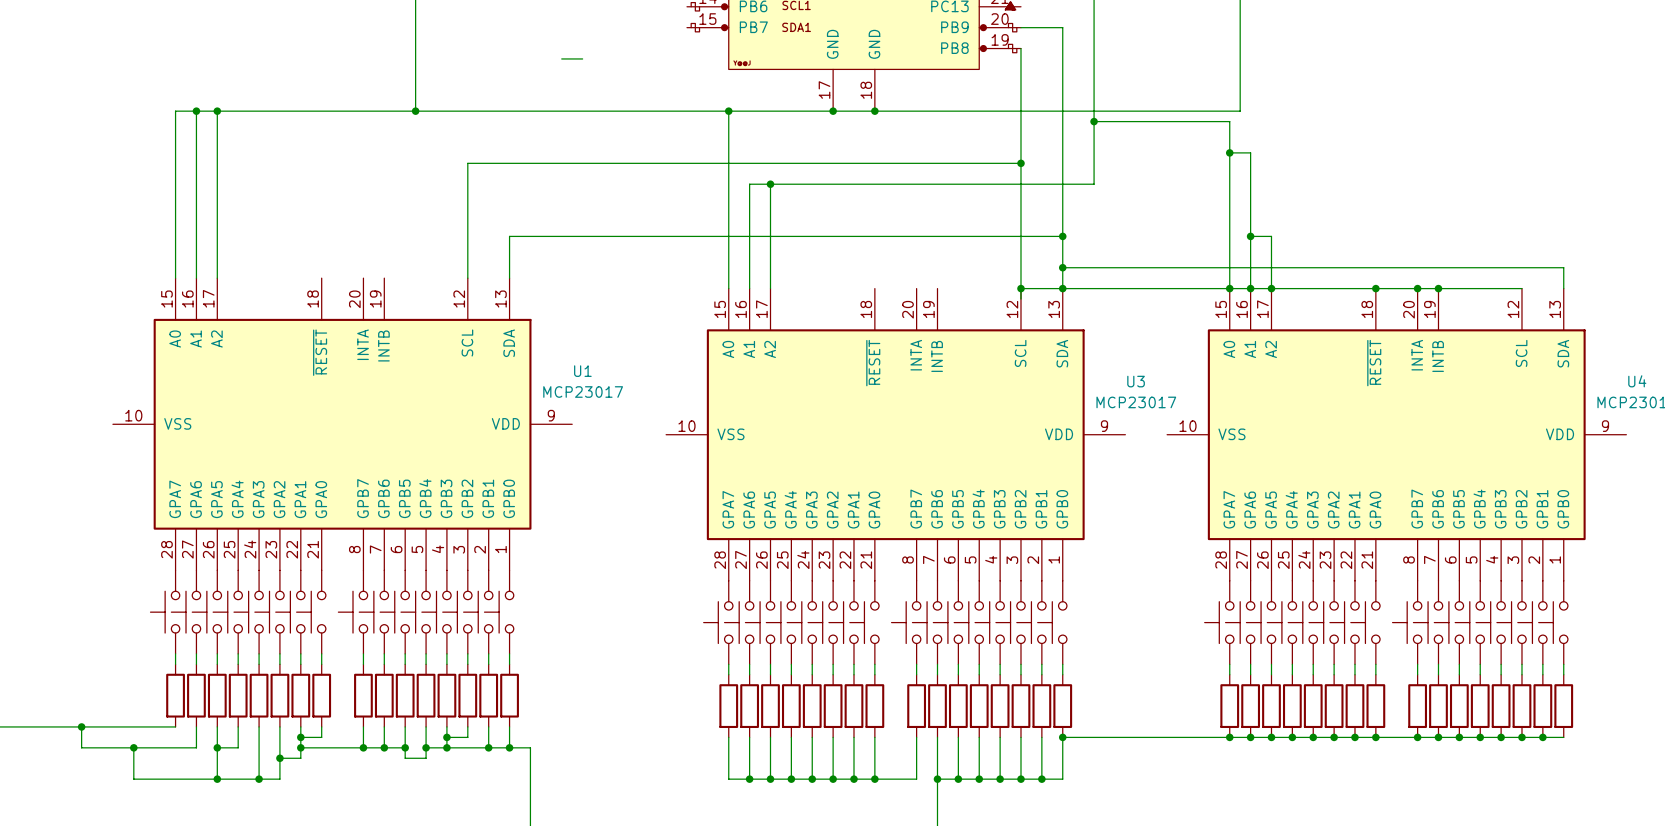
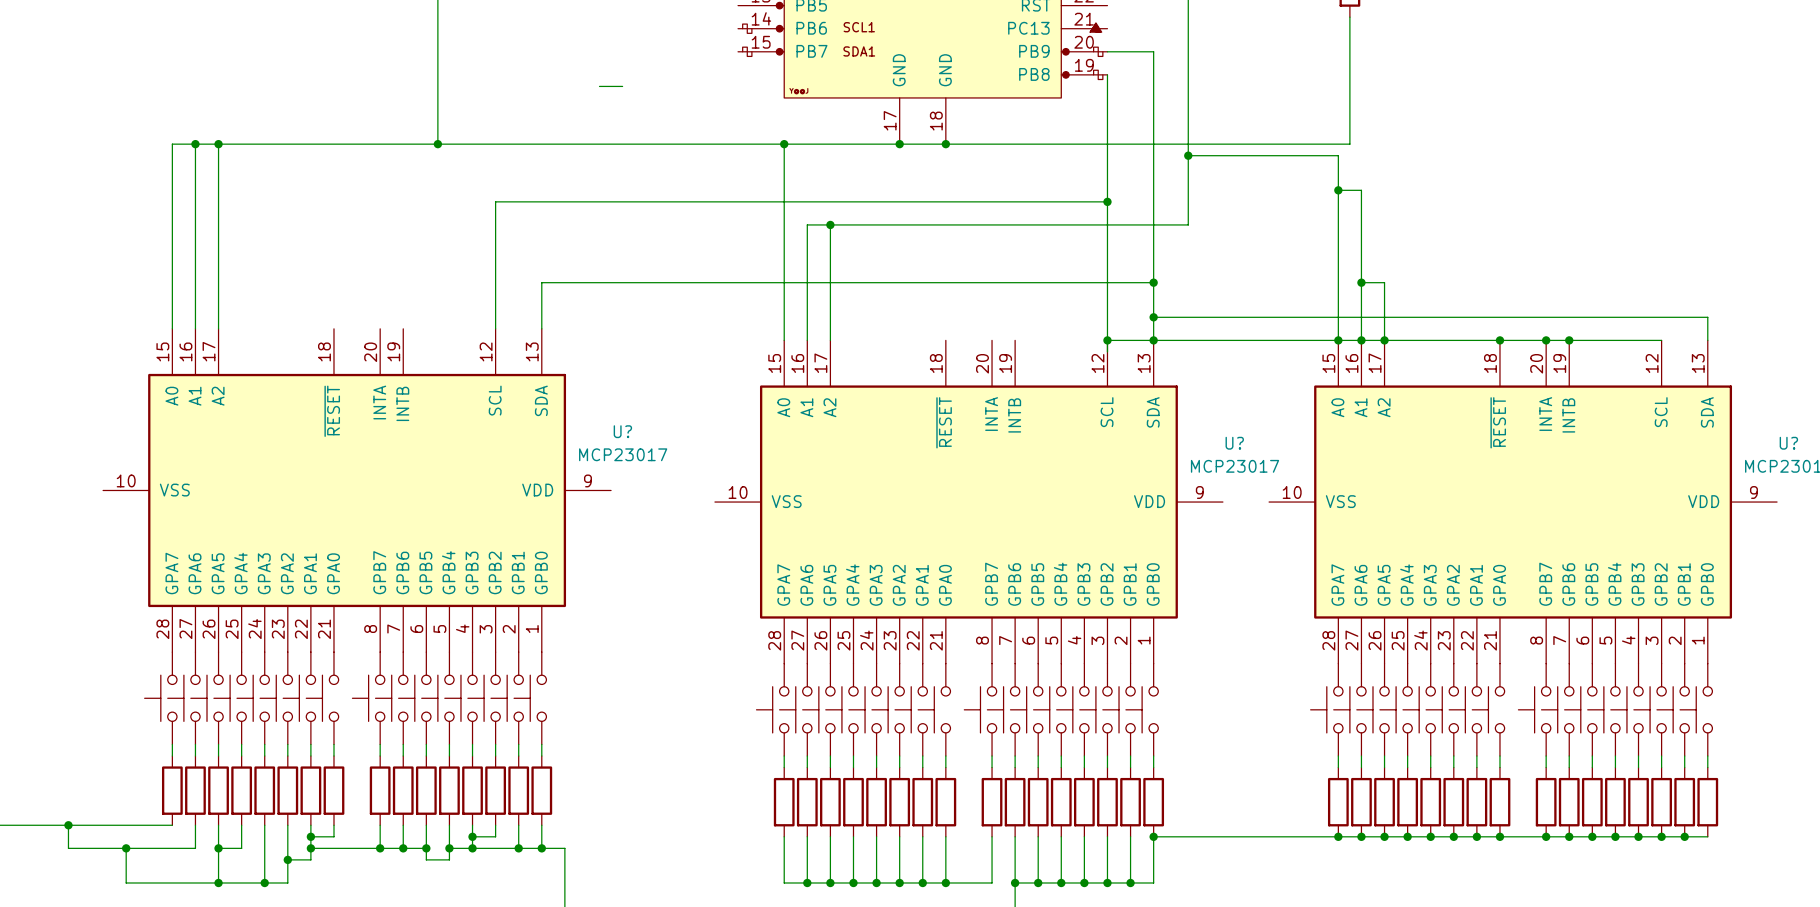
U1 name: U1 (582, 371) -> U? (622, 431)
U3 name: U3 (1136, 381) -> U? (1234, 443)
U4 name: U4 (1637, 381) -> U? (1788, 443)

